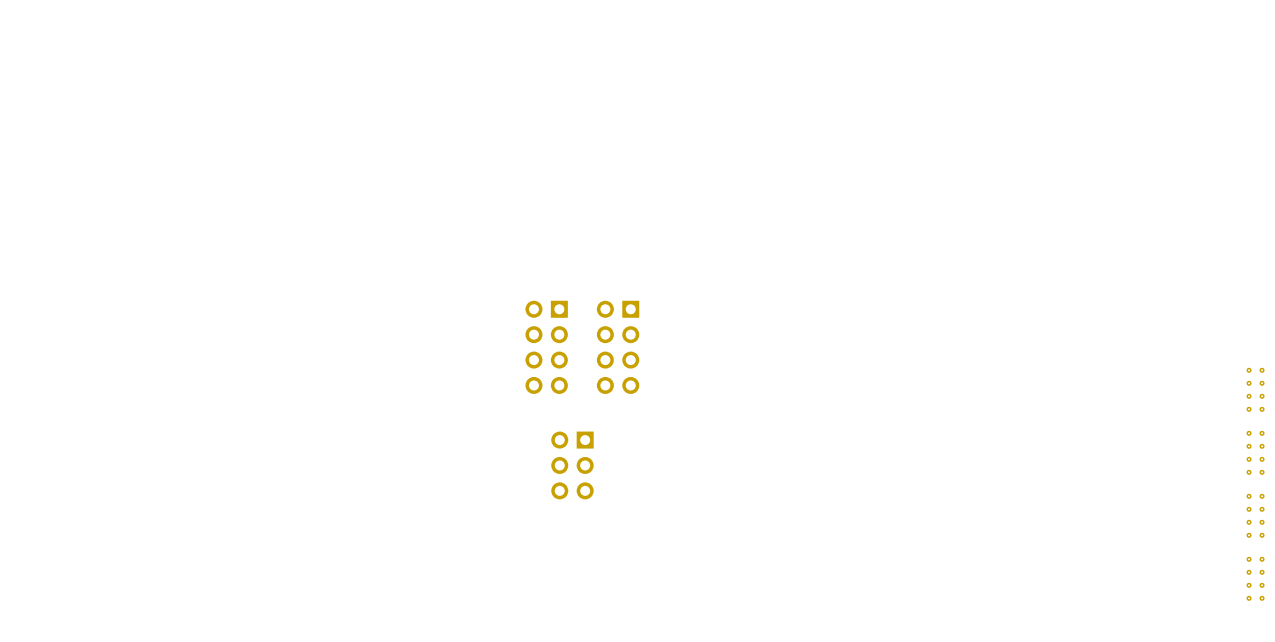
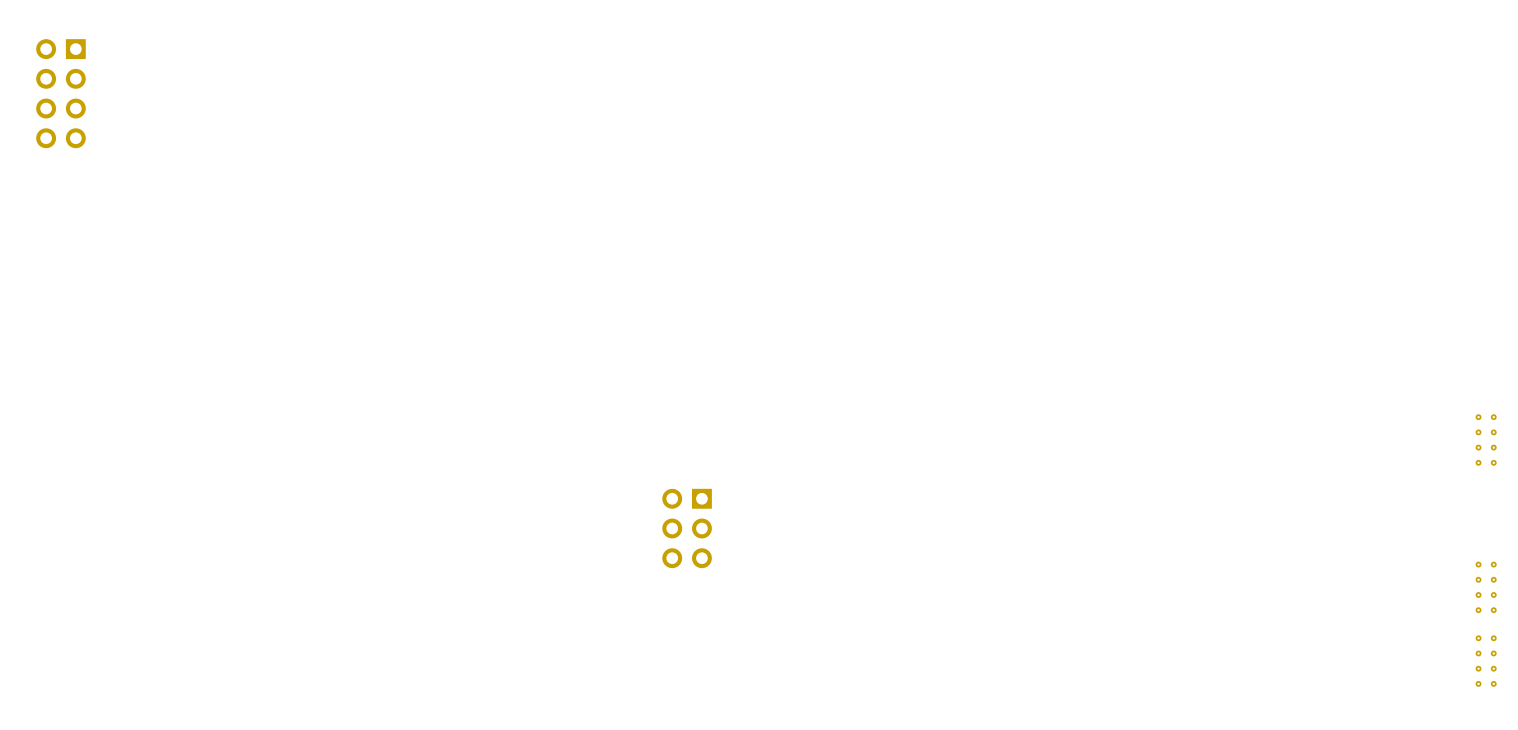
part: none -> (60, 93)
part: (546, 347) -> none
part: (618, 347) -> none
part: (1255, 452) -> none

